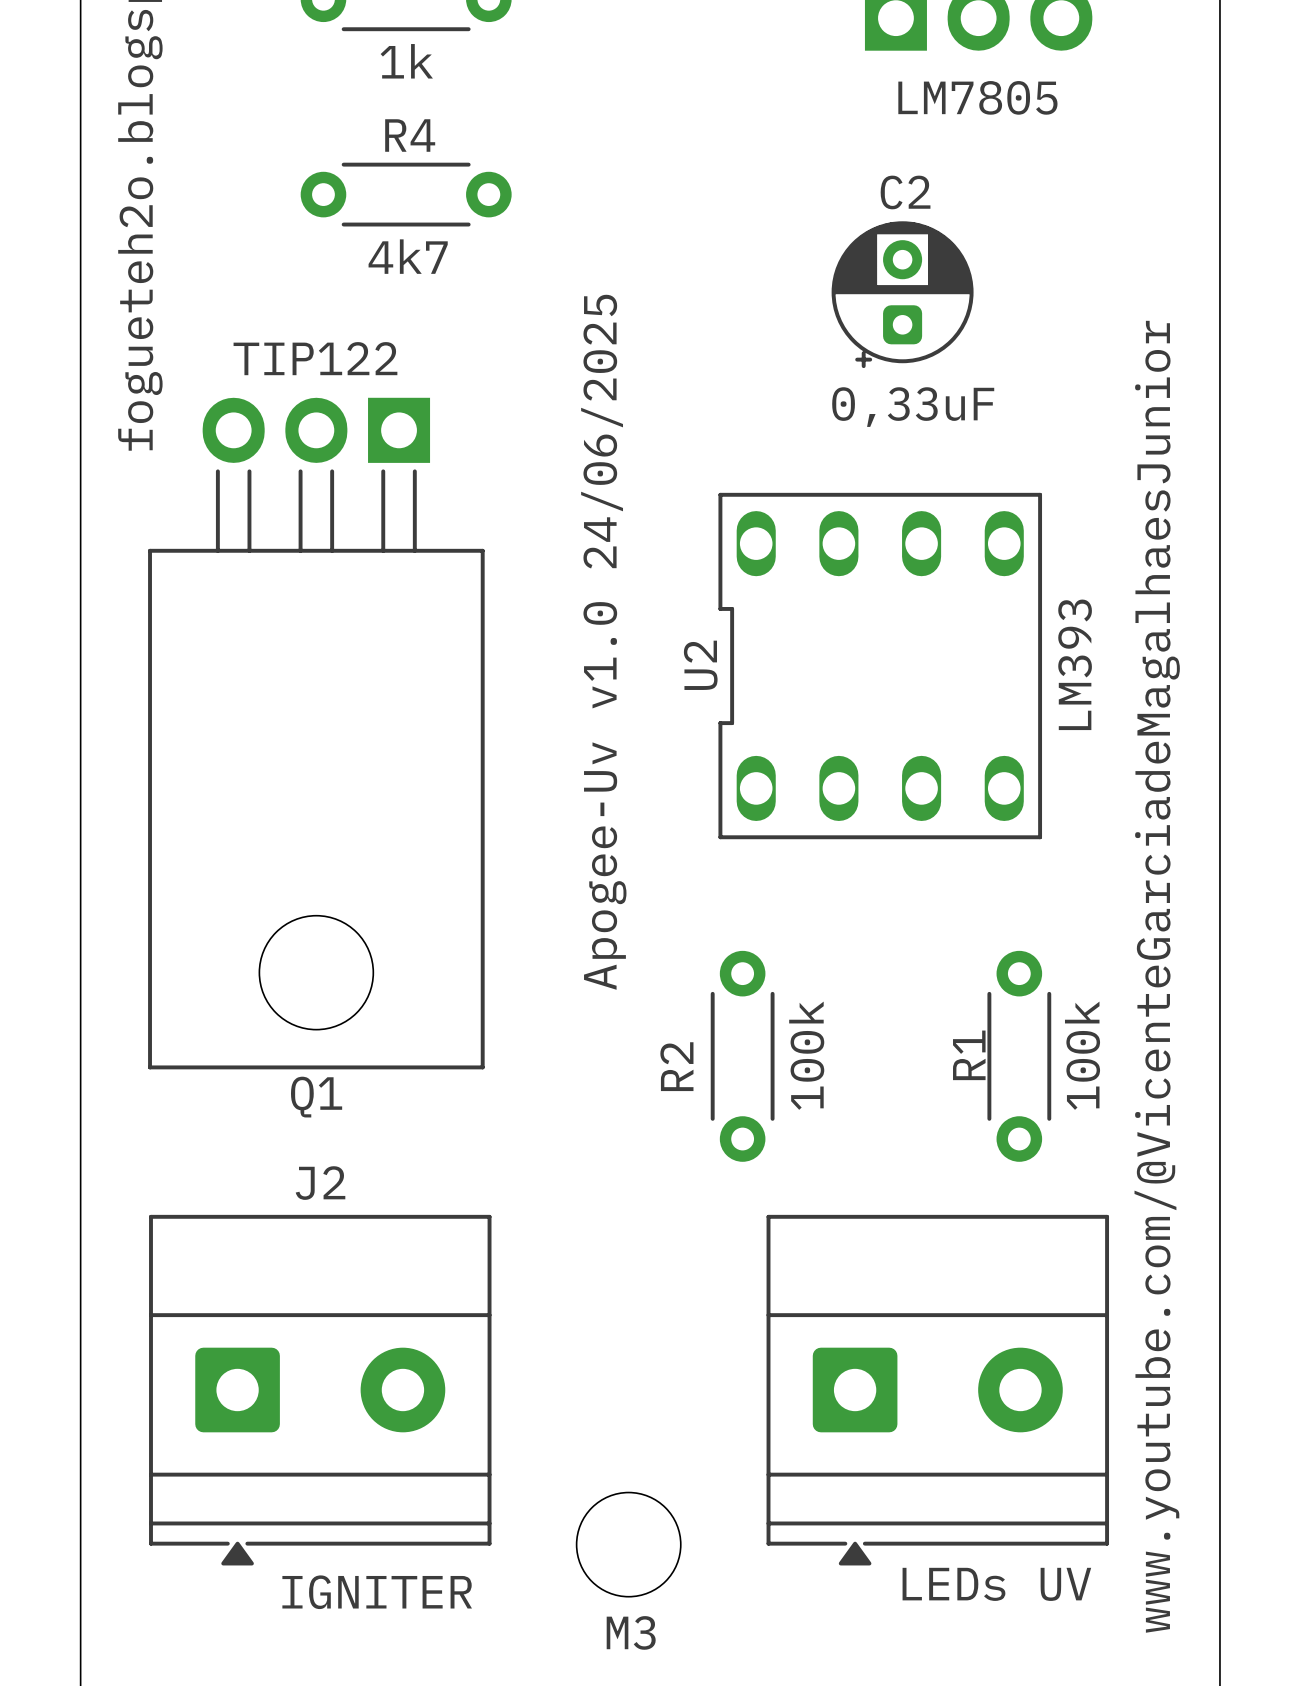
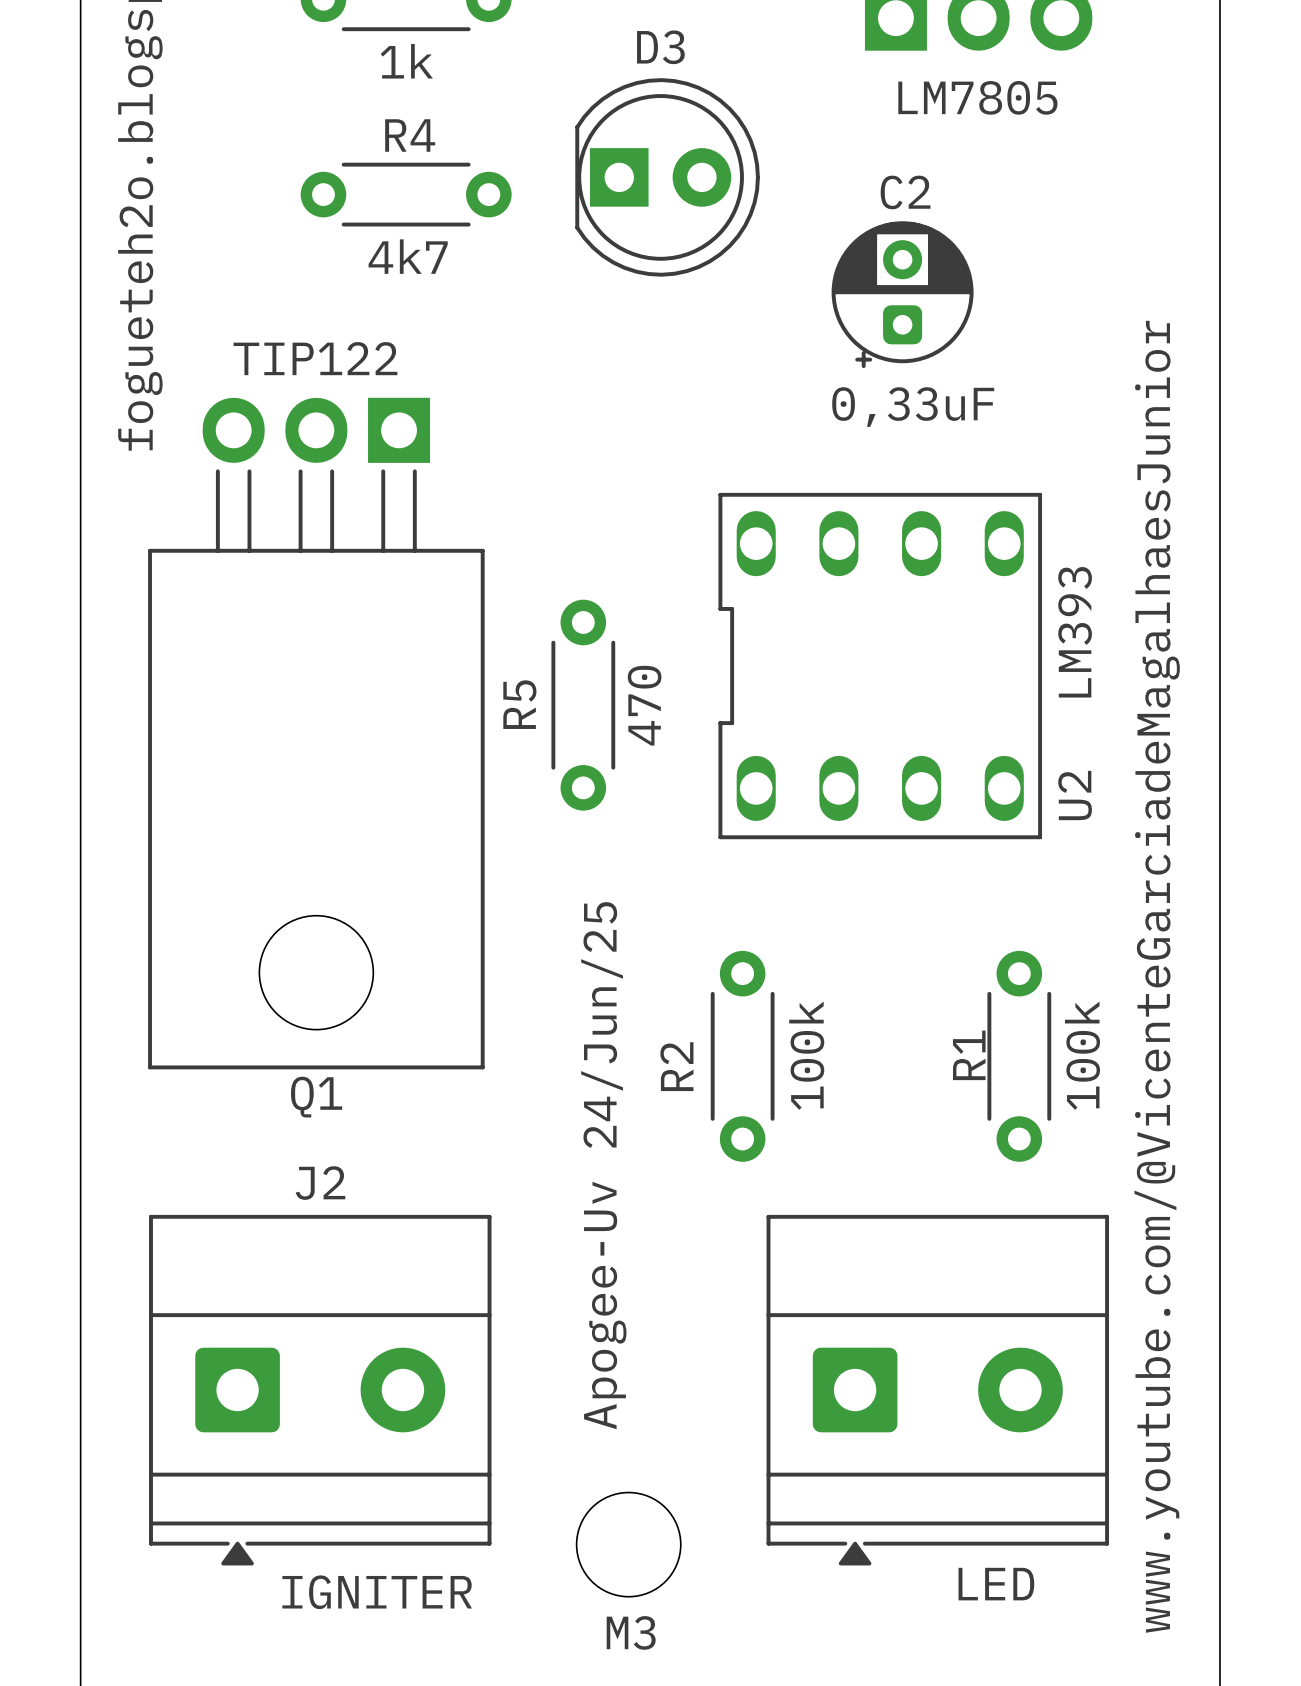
D3: none -> (667, 177)
text: Apogee-Uv v1.0 24/06/2025 (603, 642) -> Apogee-Uv 24/Jun/25 (603, 1165)
U2 value position: LM393 (1075, 664) -> LM393 (1075, 632)
U2 name position: U2 (700, 665) -> U2 (1075, 795)
R5: none -> 470 (583, 705)
part value: LEDs UV (996, 1584) -> LED (996, 1584)

